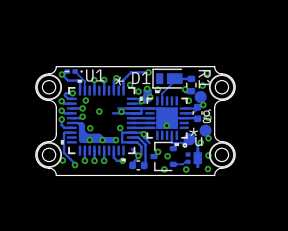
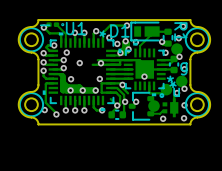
part footprint: [145, 90, 189, 147] -> [123, 42, 166, 97]
part footprint: [183, 90, 212, 146] -> [148, 43, 188, 112]
via: none -> (125, 101)
via: (167, 156) -> none
via: (164, 169) -> none

